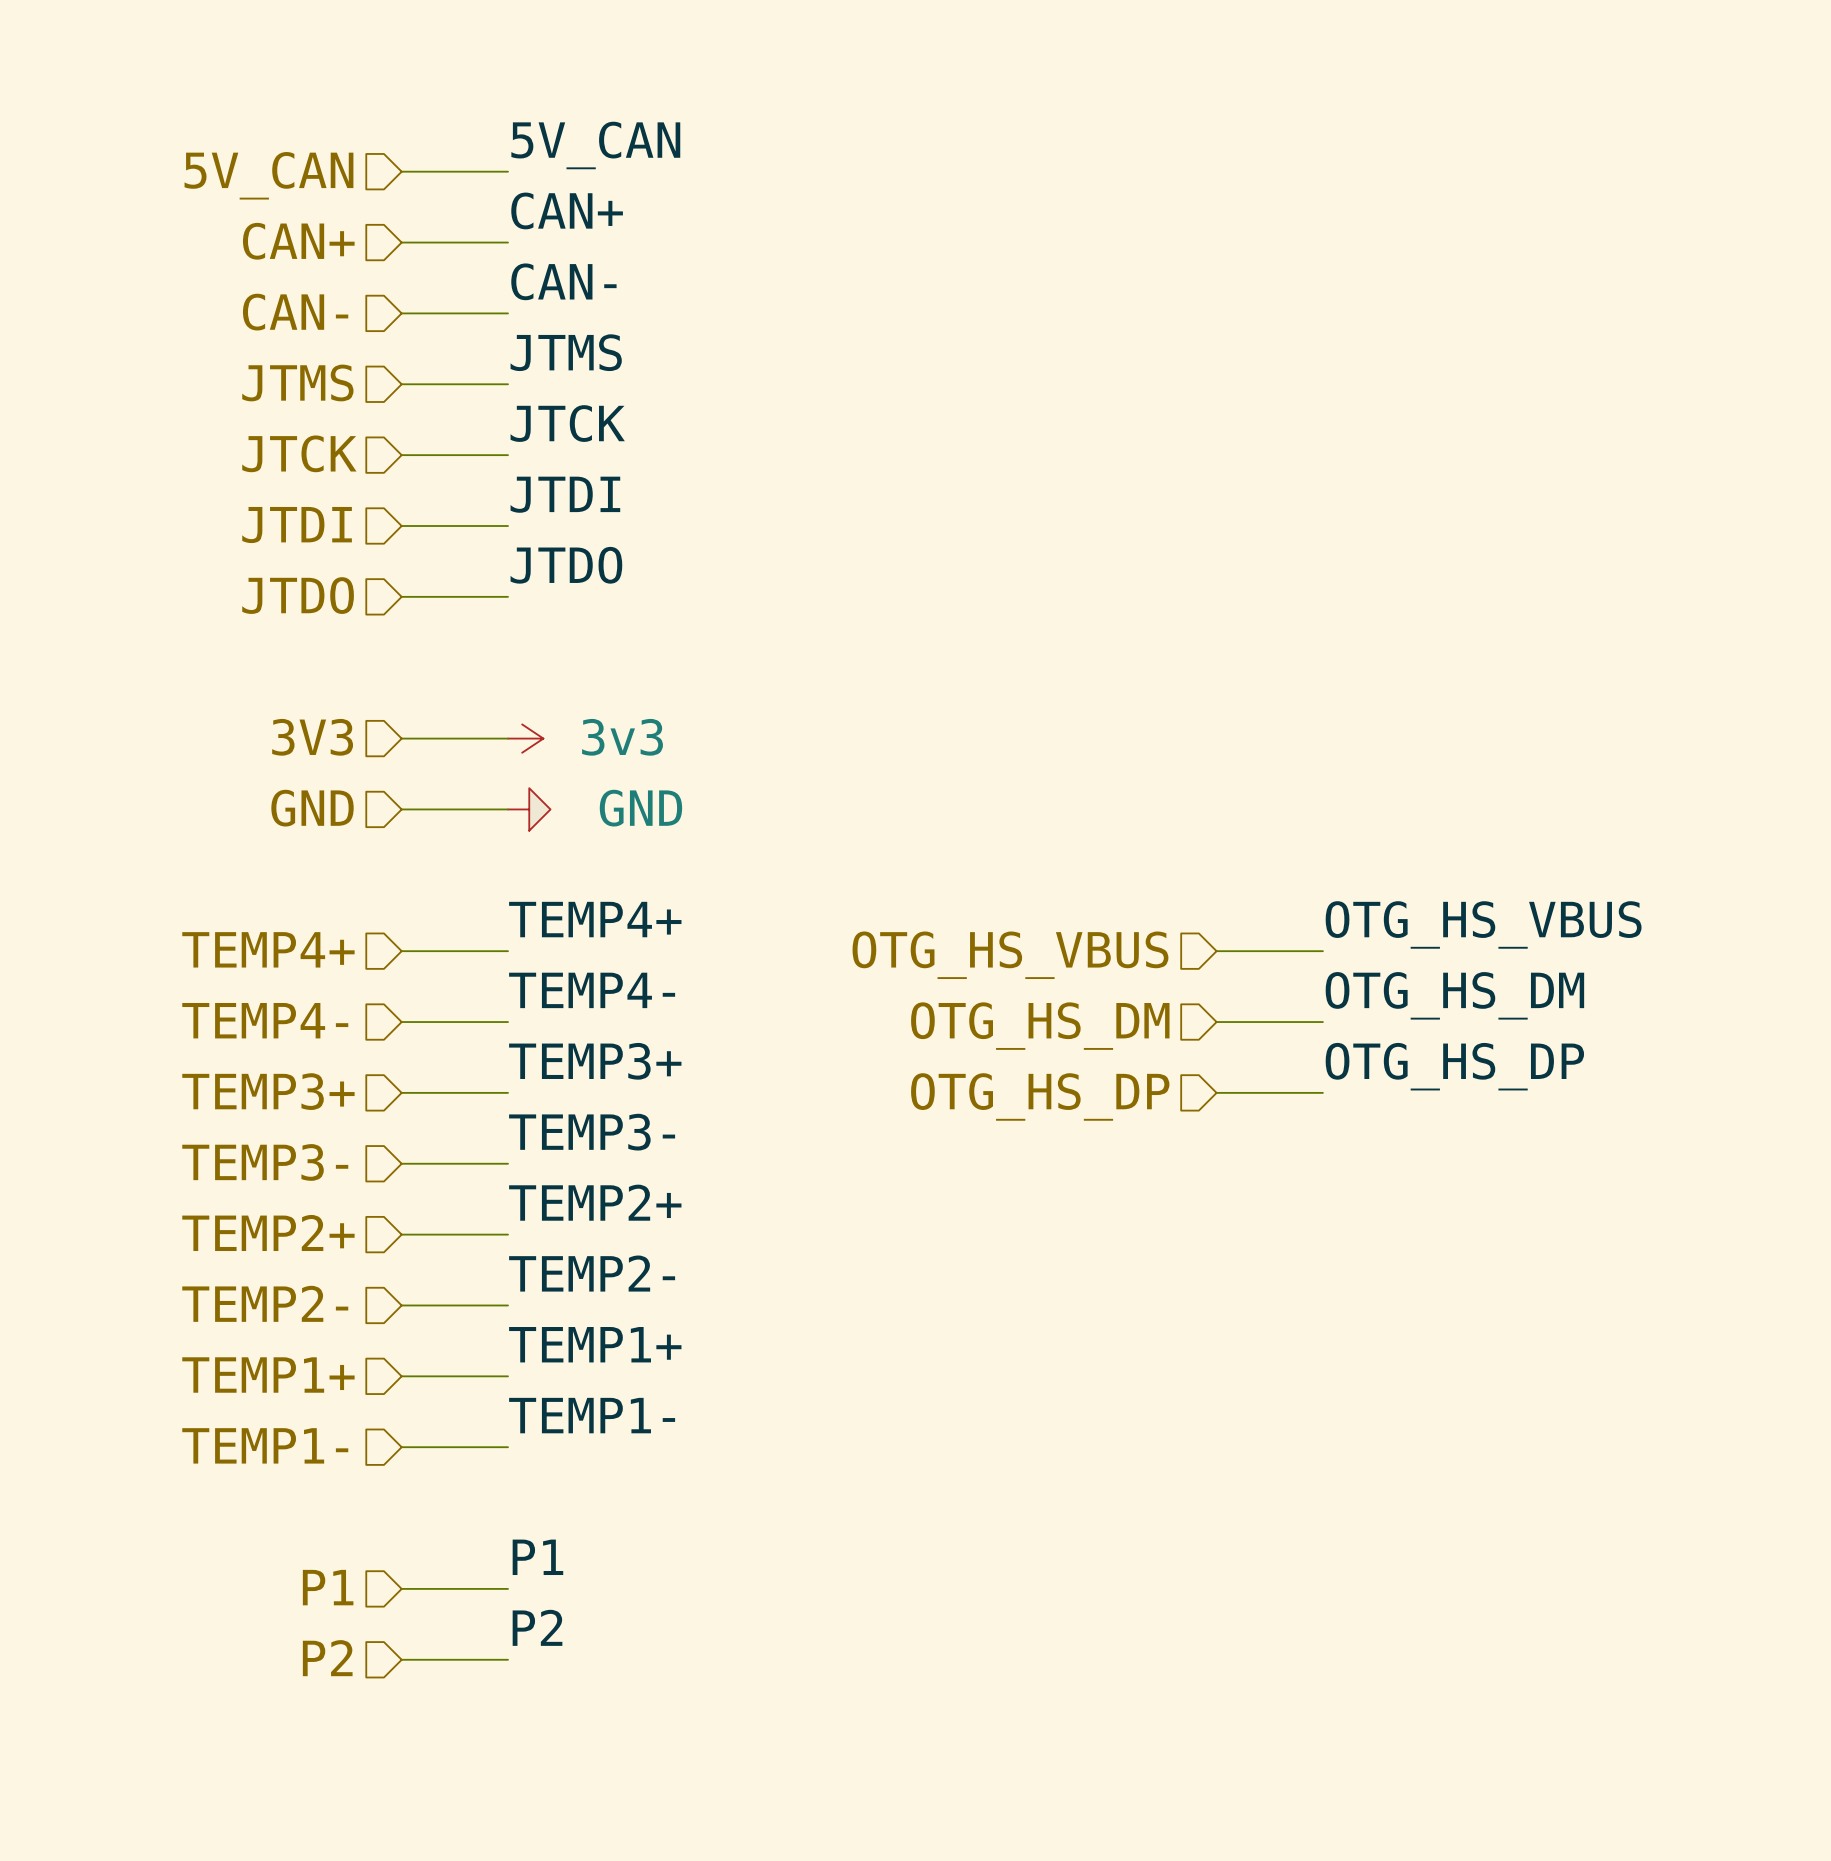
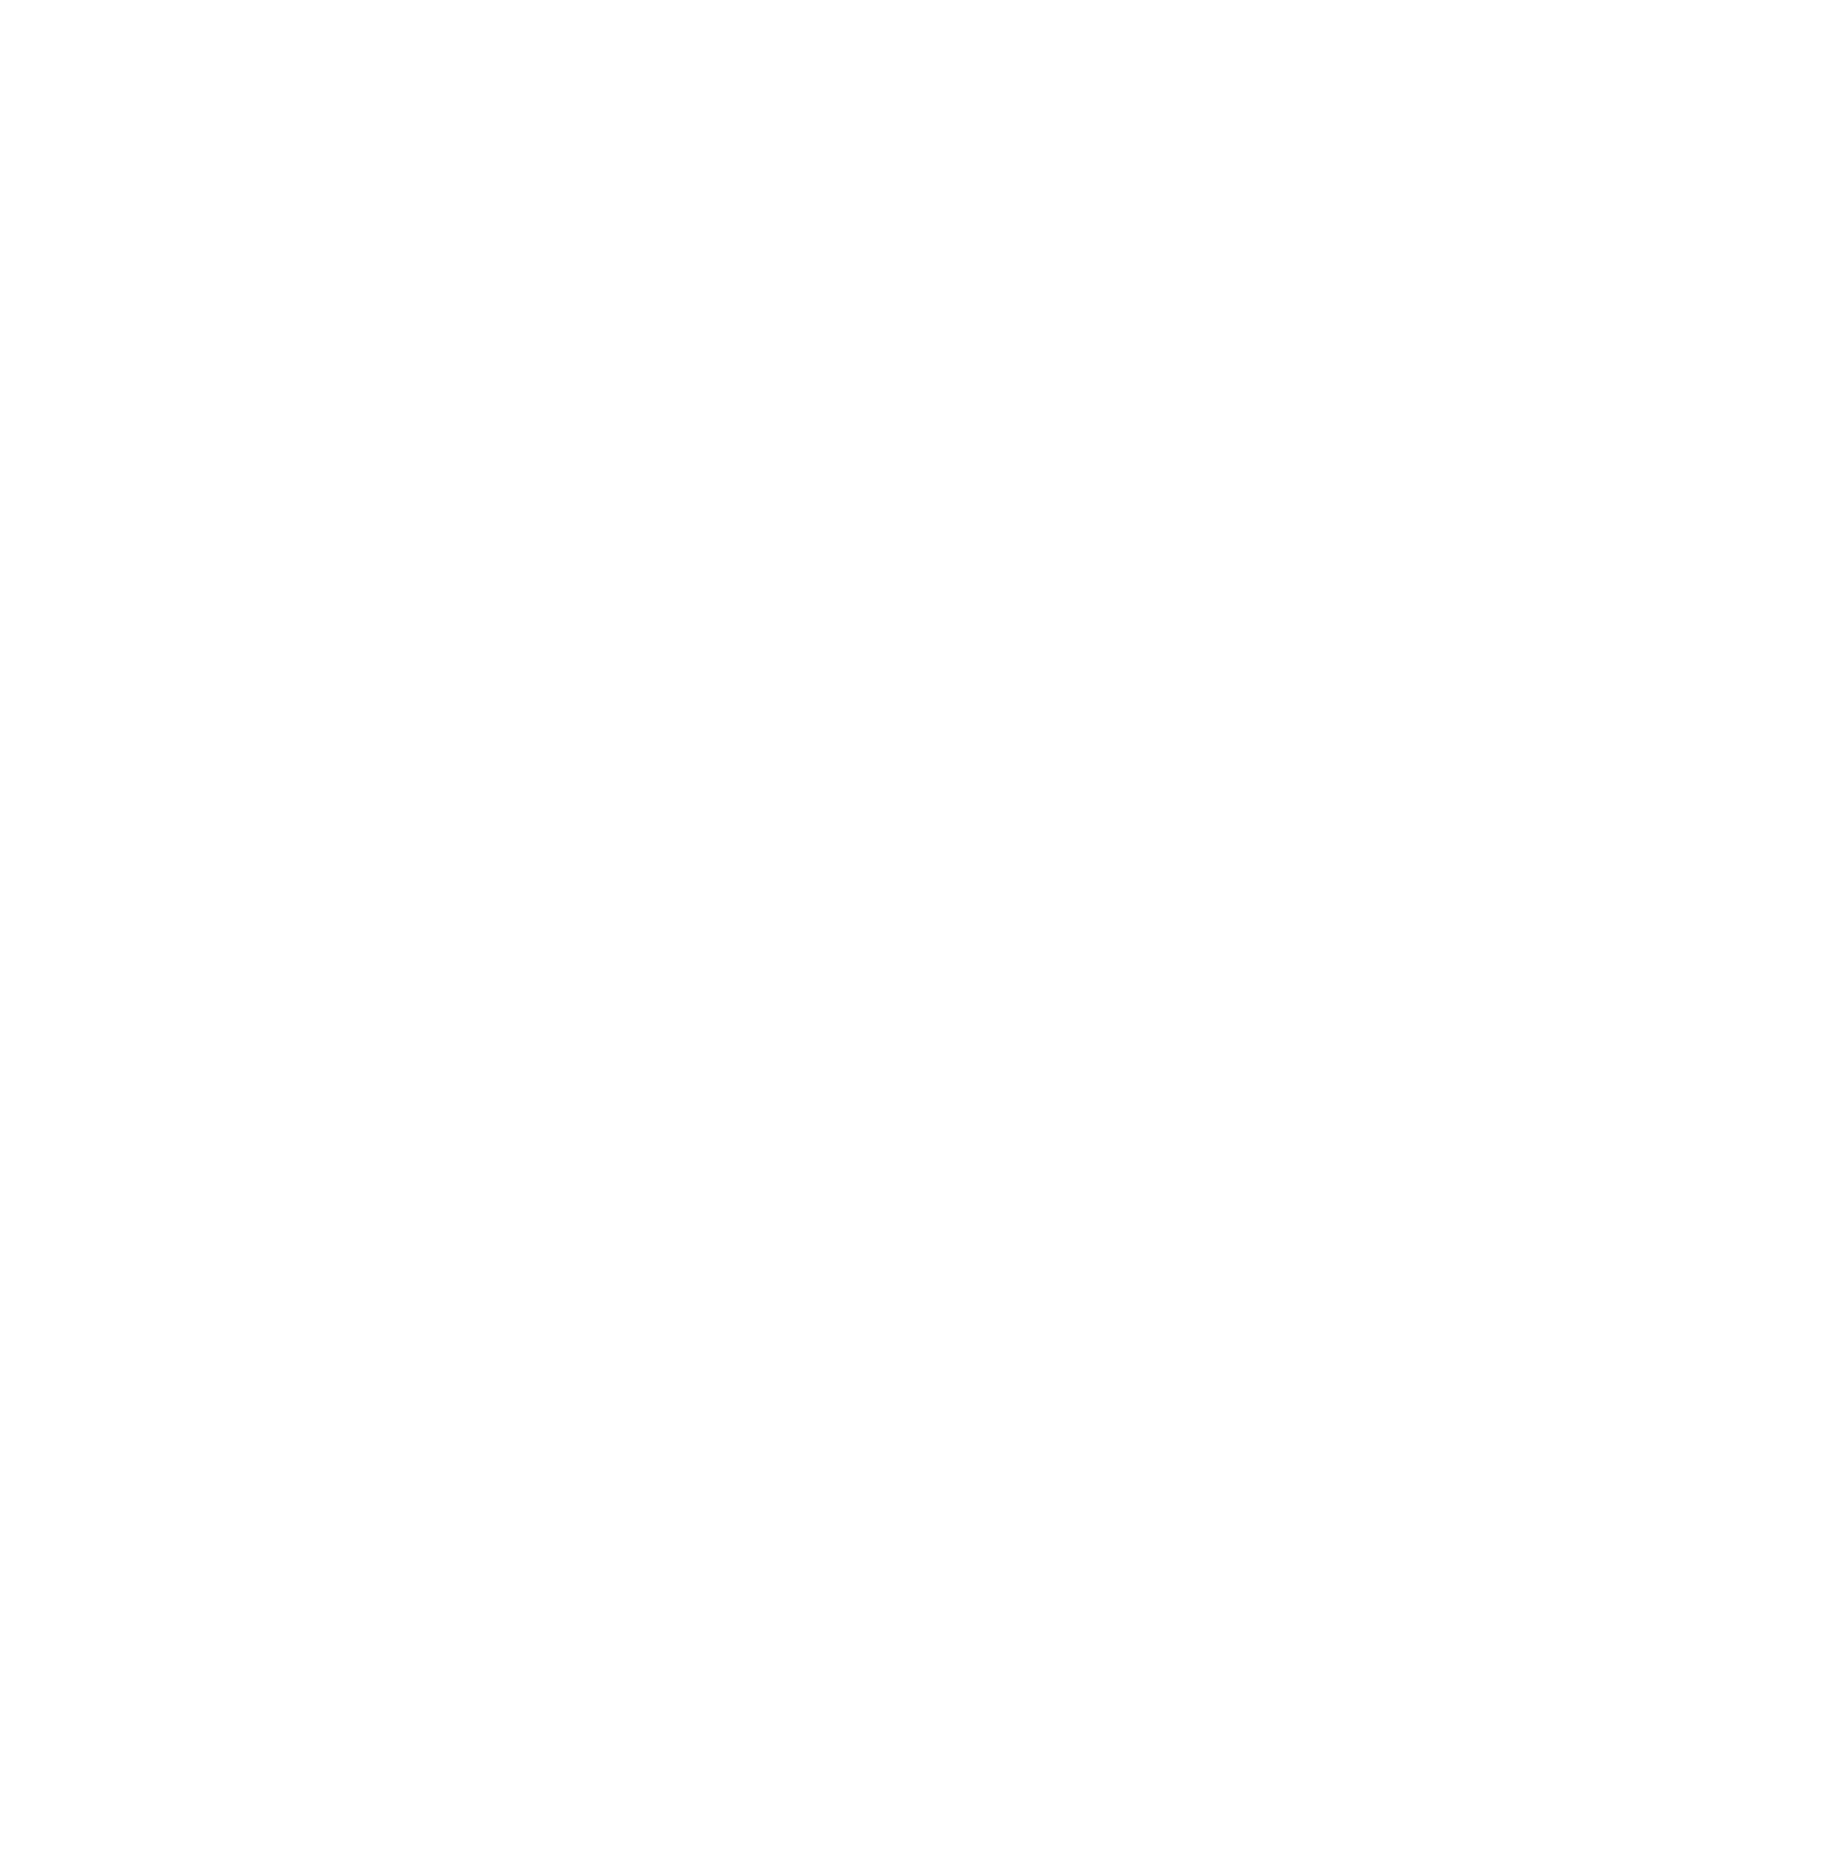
label: 5V_CAN (595, 145) -> none
wire: (401, 171) (507, 171) -> none
hierarchical label: 5V_CAN (268, 175) -> none
label: CAN+ (567, 210) -> none
hierarchical label: CAN+ (298, 241) -> none
wire: (401, 242) (507, 242) -> none
label: CAN- (563, 281) -> none
hierarchical label: CAN- (295, 312) -> none
wire: (401, 313) (507, 313) -> none
label: JTMS (566, 352) -> none
hierarchical label: JTMS (297, 382) -> none
wire: (401, 384) (507, 384) -> none
label: JTCK (567, 423) -> none
hierarchical label: JTCK (299, 453) -> none
wire: (401, 455) (507, 455) -> none
label: JTDI (565, 494) -> none
hierarchical label: JTDI (297, 525) -> none
wire: (401, 526) (507, 526) -> none
label: JTDO (566, 565) -> none
hierarchical label: JTDO (298, 595) -> none
wire: (401, 596) (507, 596) -> none
hierarchical label: 3V3 (312, 737) -> none
wire: (401, 738) (507, 738) -> none
power symbol: 3v3 (525, 738) -> none
hierarchical label: GND (312, 808) -> none
wire: (401, 809) (507, 809) -> none
power symbol: GND (529, 809) -> none
label: TEMP4+ (595, 919) -> none
label: OTG_HS_VBUS (1483, 924) -> none
hierarchical label: TEMP4+ (268, 949) -> none
wire: (401, 951) (507, 951) -> none
wire: (1216, 951) (1322, 951) -> none
hierarchical label: OTG_HS_VBUS (1010, 955) -> none
label: TEMP4- (592, 990) -> none
label: OTG_HS_DM (1454, 995) -> none
hierarchical label: TEMP4- (265, 1020) -> none
wire: (401, 1022) (507, 1022) -> none
wire: (1216, 1022) (1322, 1022) -> none
hierarchical label: OTG_HS_DM (1040, 1026) -> none
label: TEMP3+ (595, 1061) -> none
label: OTG_HS_DP (1454, 1066) -> none
hierarchical label: TEMP3+ (268, 1091) -> none
wire: (401, 1092) (507, 1092) -> none
wire: (1216, 1092) (1322, 1092) -> none
hierarchical label: OTG_HS_DP (1040, 1096) -> none
label: TEMP3- (592, 1132) -> none
hierarchical label: TEMP3- (265, 1162) -> none
wire: (401, 1163) (507, 1163) -> none
label: TEMP2+ (595, 1202) -> none
hierarchical label: TEMP2+ (268, 1232) -> none
wire: (401, 1234) (507, 1234) -> none
label: TEMP2- (592, 1273) -> none
hierarchical label: TEMP2- (265, 1303) -> none
wire: (401, 1305) (507, 1305) -> none
label: TEMP1+ (595, 1344) -> none
hierarchical label: TEMP1+ (268, 1375) -> none
wire: (401, 1376) (507, 1376) -> none
label: TEMP1- (592, 1415) -> none
hierarchical label: TEMP1- (265, 1445) -> none
wire: (401, 1447) (507, 1447) -> none
label: P1 (537, 1557) -> none
hierarchical label: P1 (328, 1587) -> none
wire: (401, 1588) (507, 1588) -> none
label: P2 (537, 1627) -> none
hierarchical label: P2 (327, 1658) -> none
wire: (401, 1659) (507, 1659) -> none

